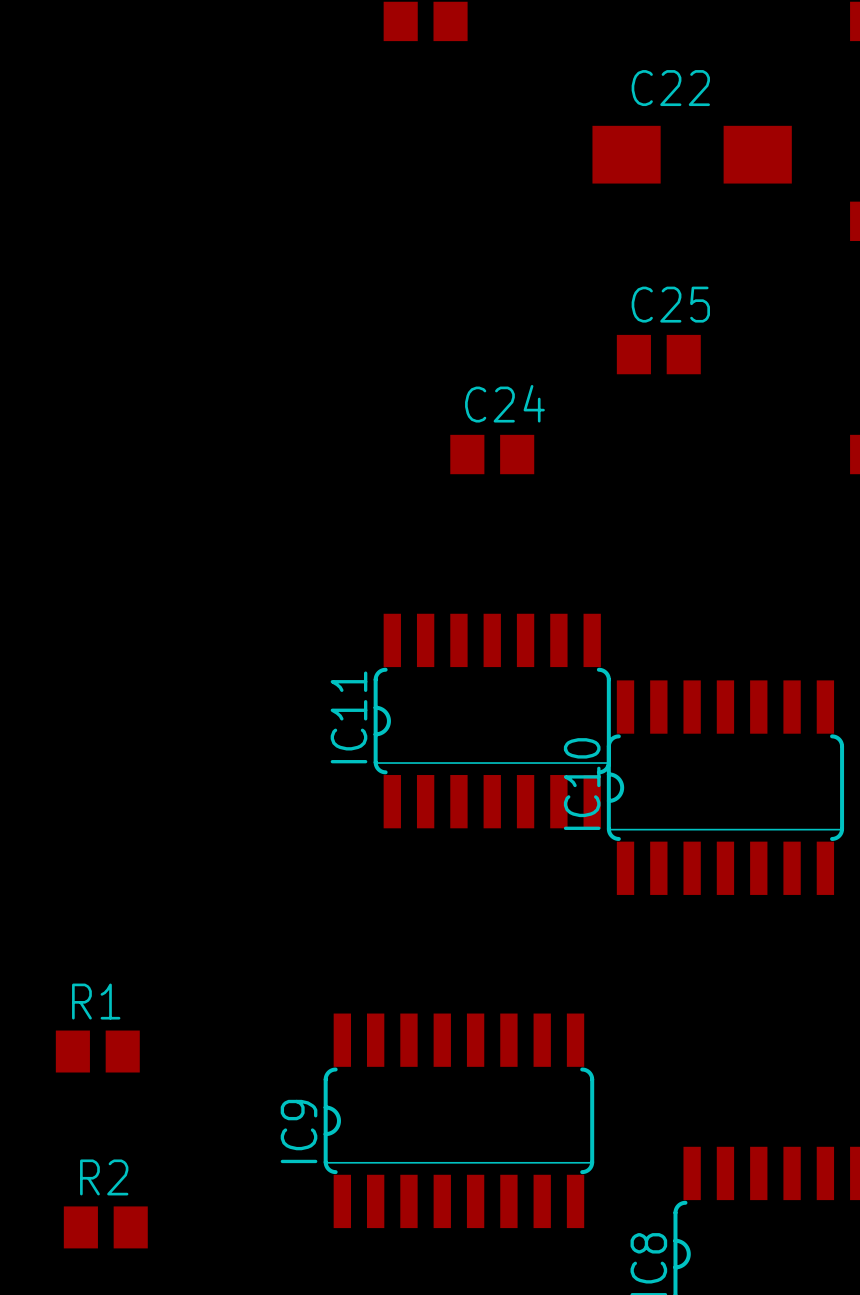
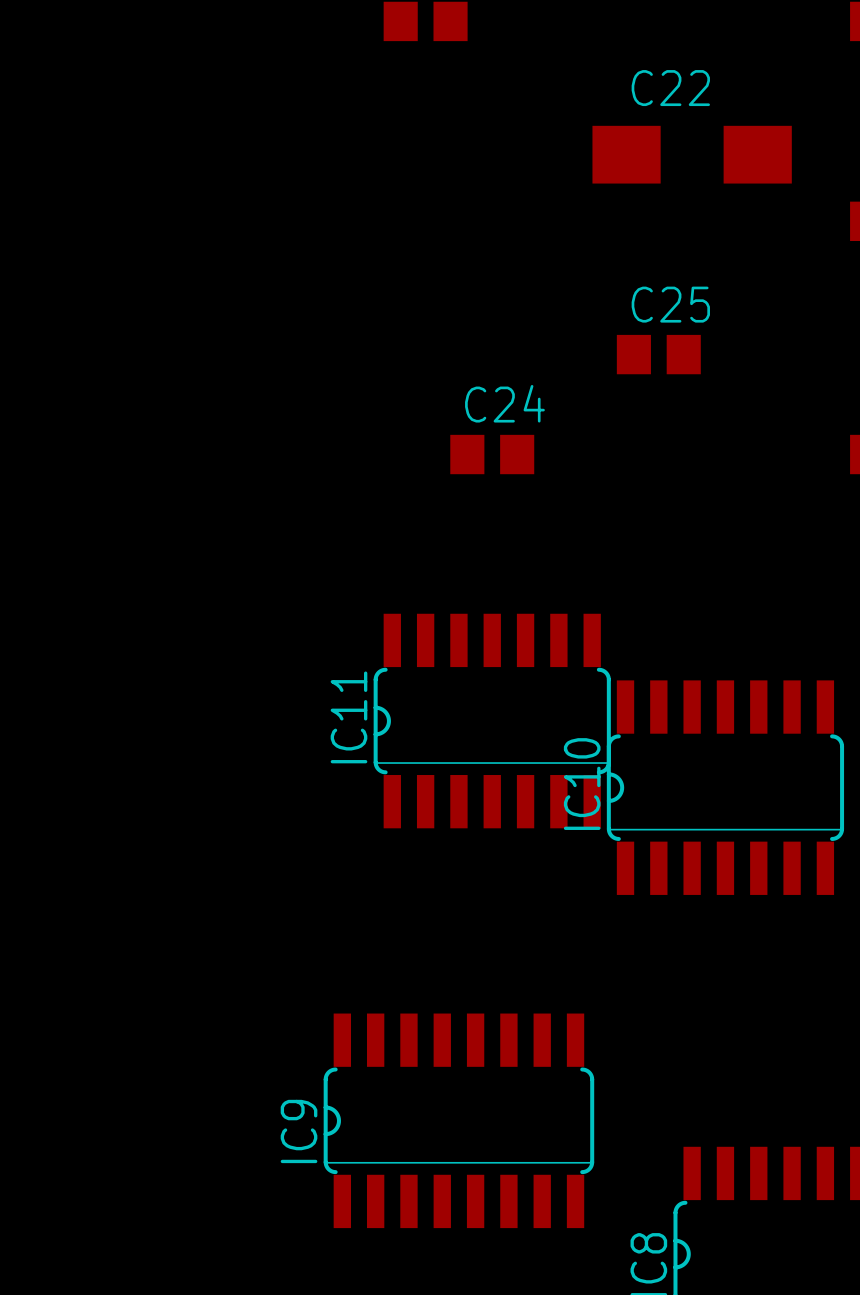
R1: (97, 1051) -> none
R2: (105, 1227) -> none

